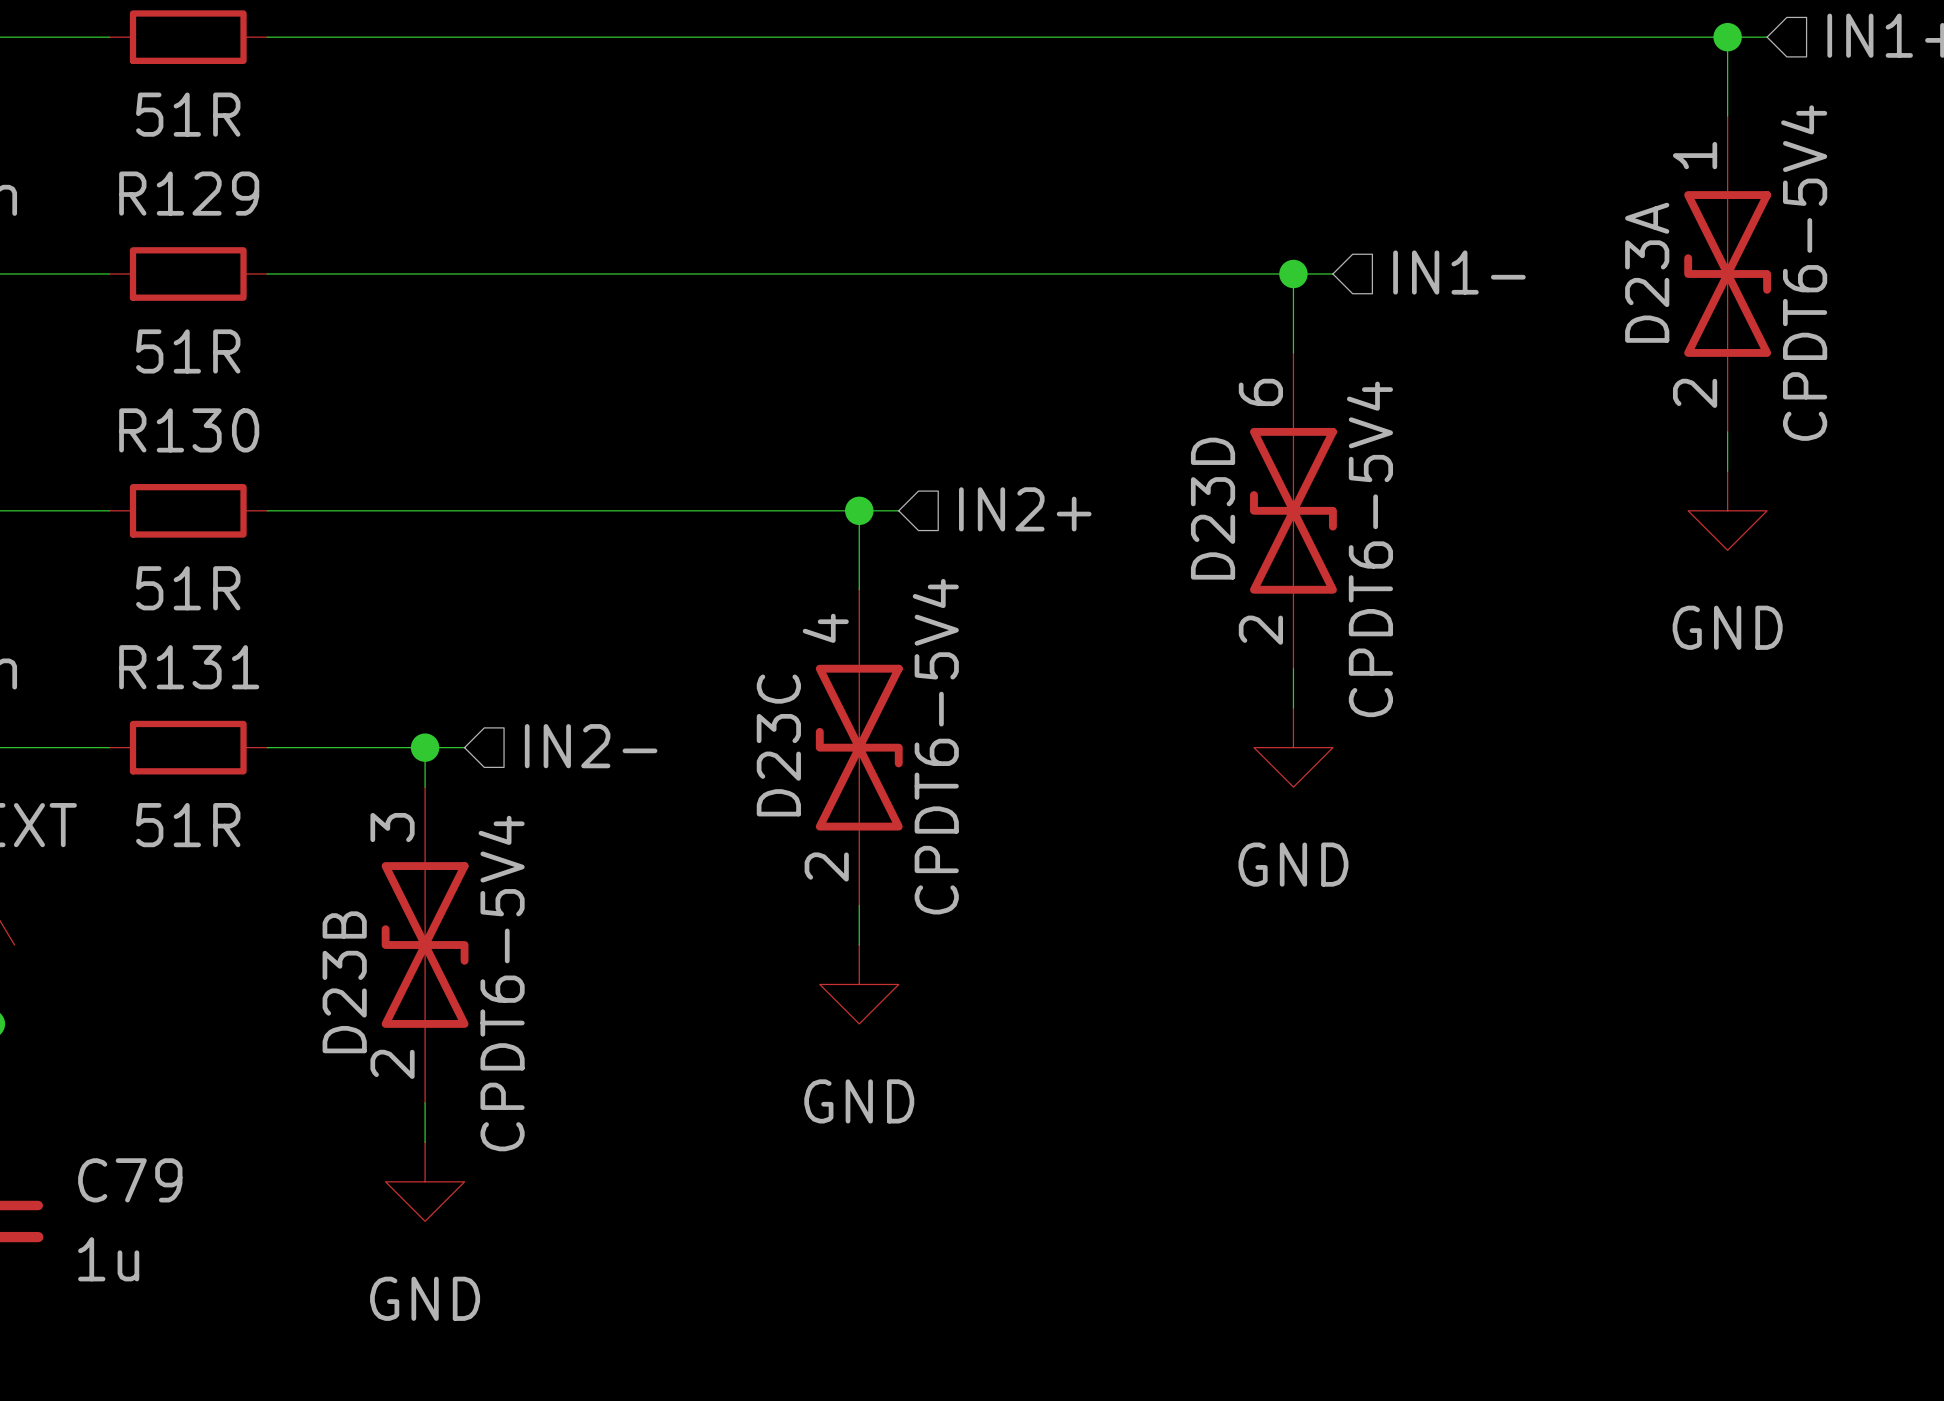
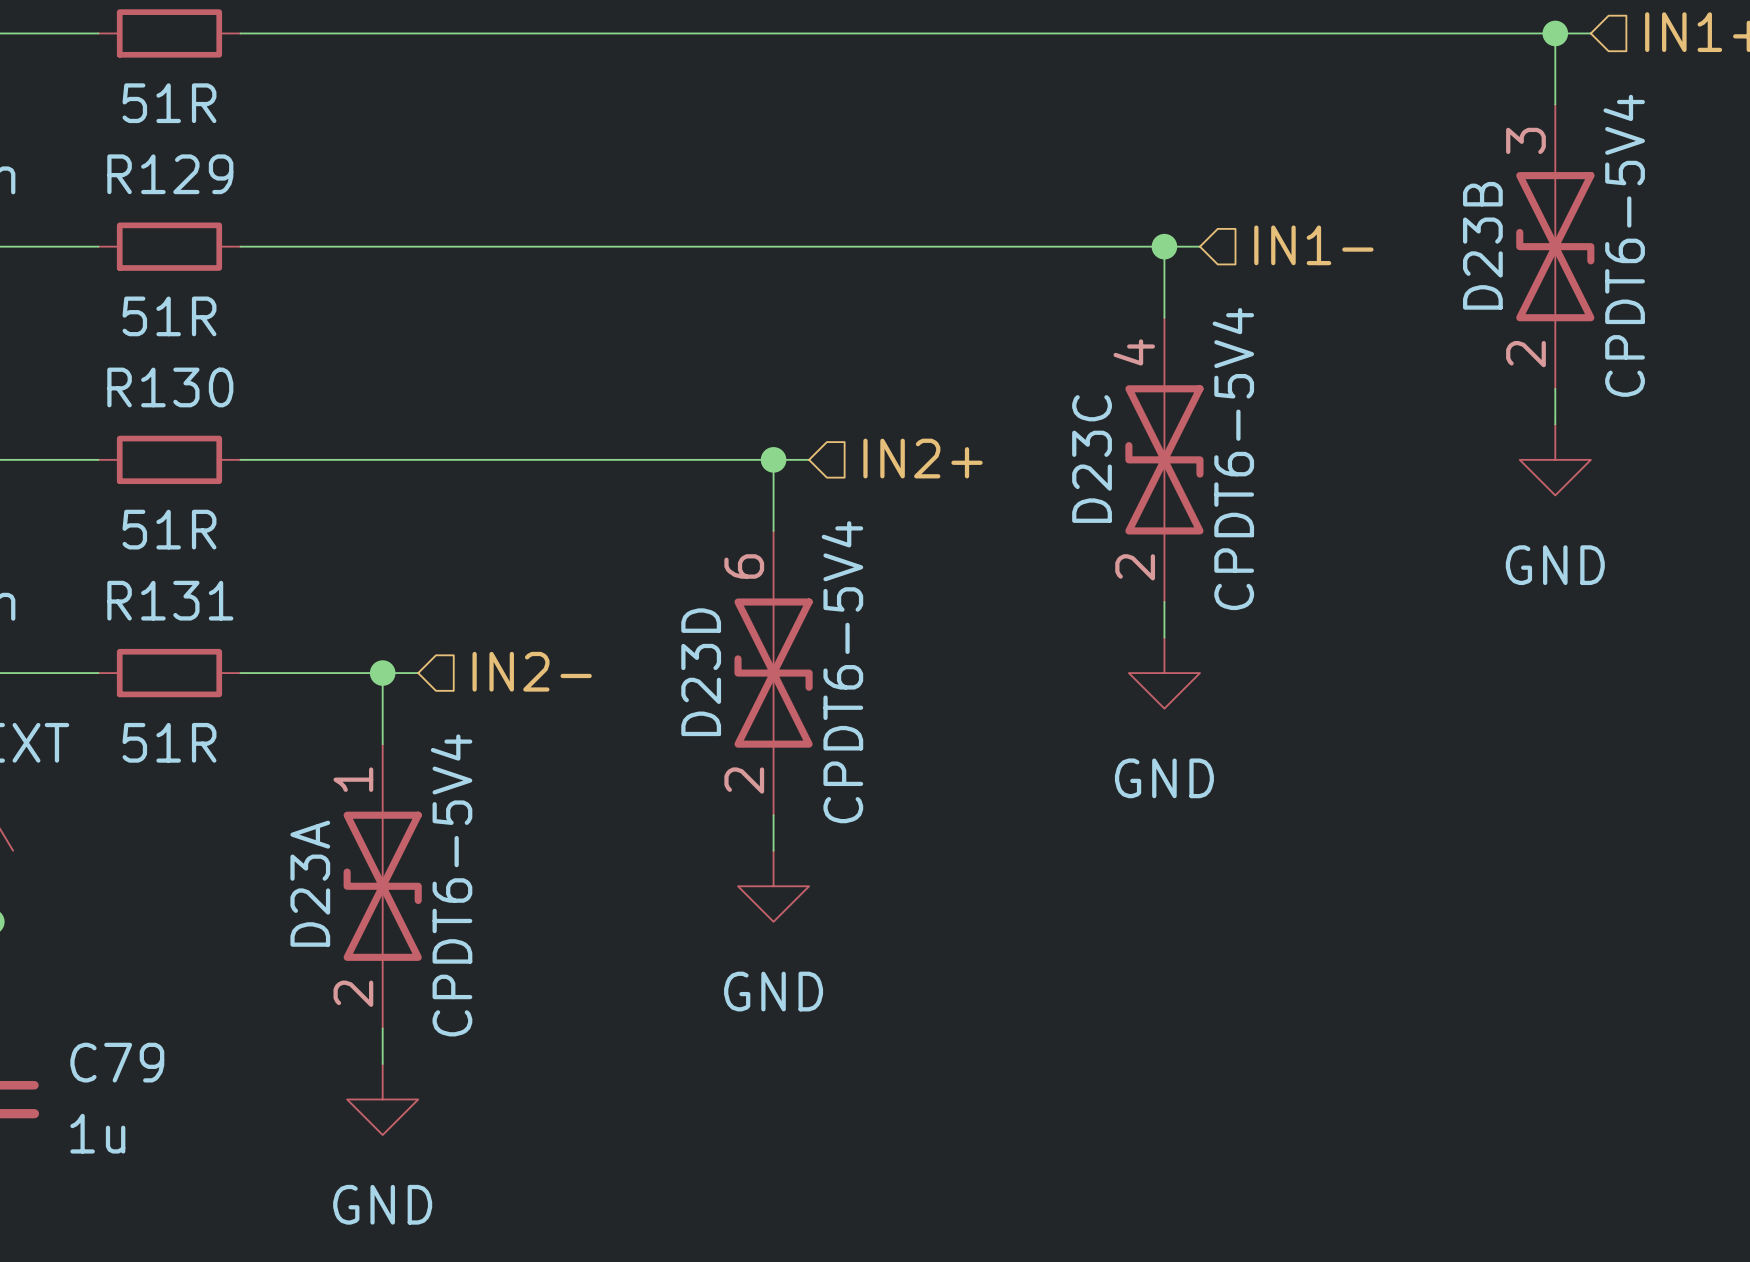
D23A name position: D23A (1647, 272) -> D23A (310, 883)
D23A position: (1727, 273) -> (382, 886)
D23D name position: D23D (1213, 508) -> D23D (701, 672)
D23D position: (1293, 510) -> (773, 673)
D23D value position: CPDT6-5V4 (1369, 549) -> CPDT6-5V4 (842, 672)
D23C name position: D23C (778, 745) -> D23C (1092, 459)
D23C position: (859, 747) -> (1164, 459)
D23B position: (425, 945) -> (1555, 246)
D23B name position: D23B (344, 982) -> D23B (1482, 245)
power symbol position: GND (425, 1181) -> GND (382, 1099)

